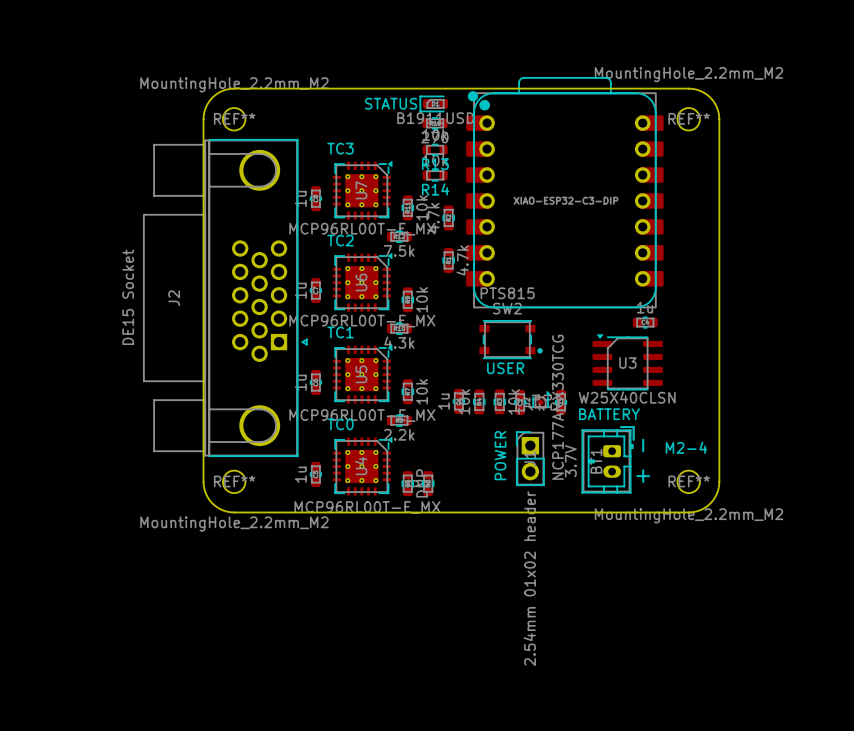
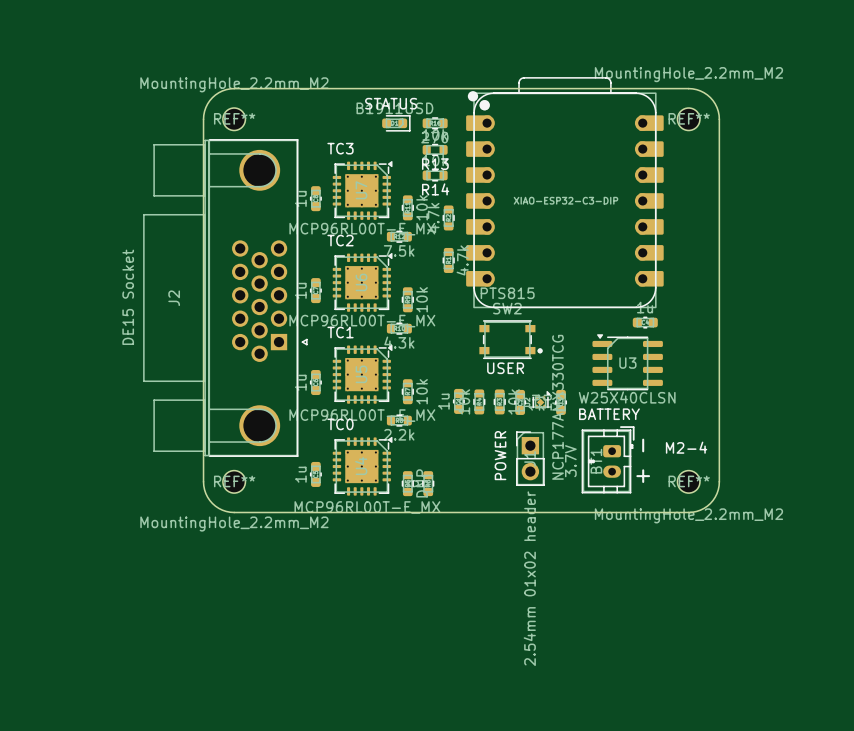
part rotation: 0° (433, 103) -> 180° (396, 123)
part position: (433, 103) -> (396, 123)

